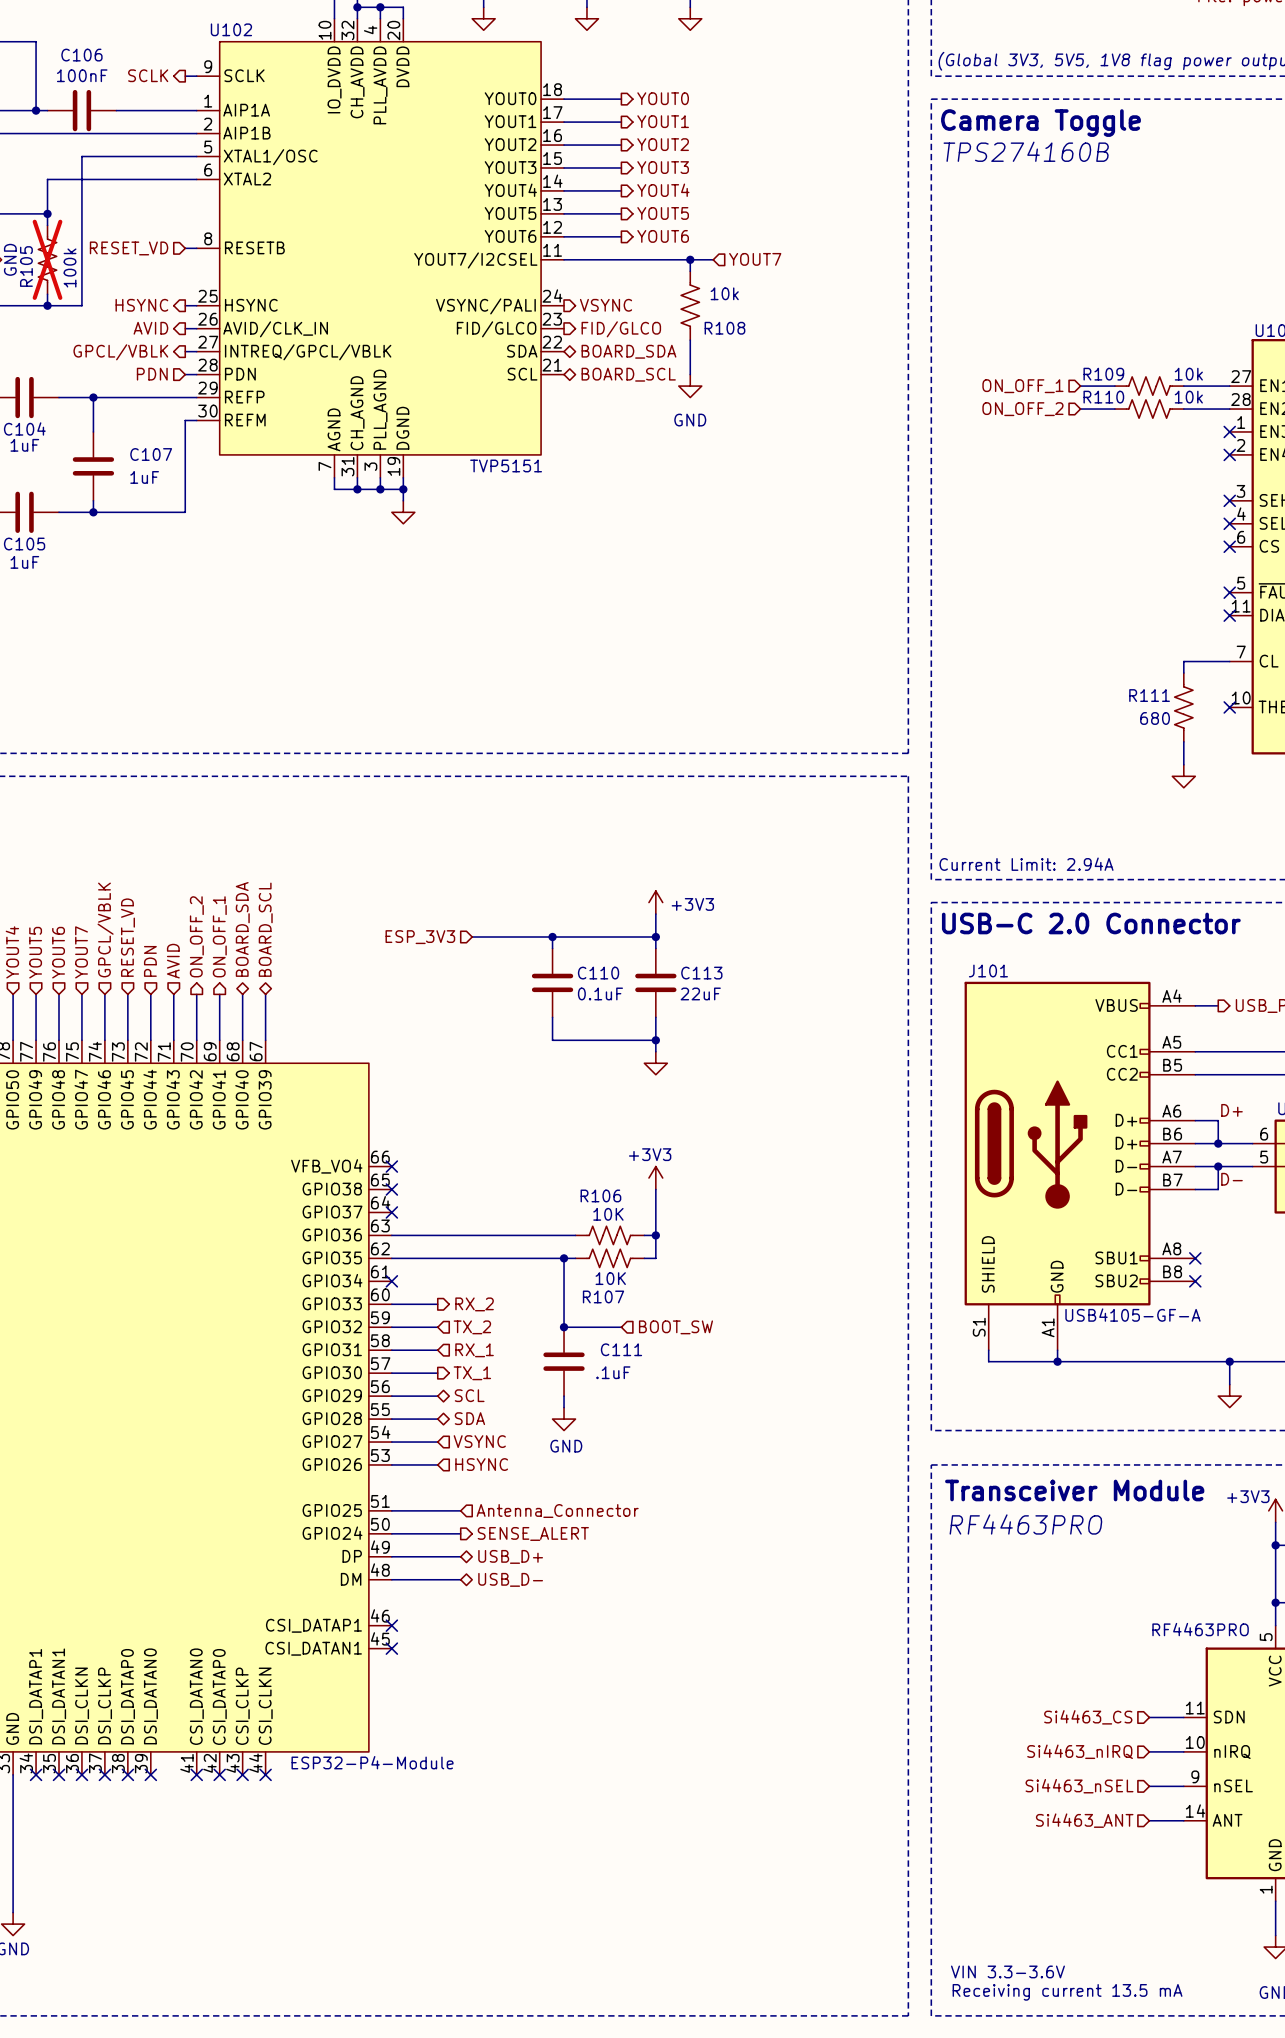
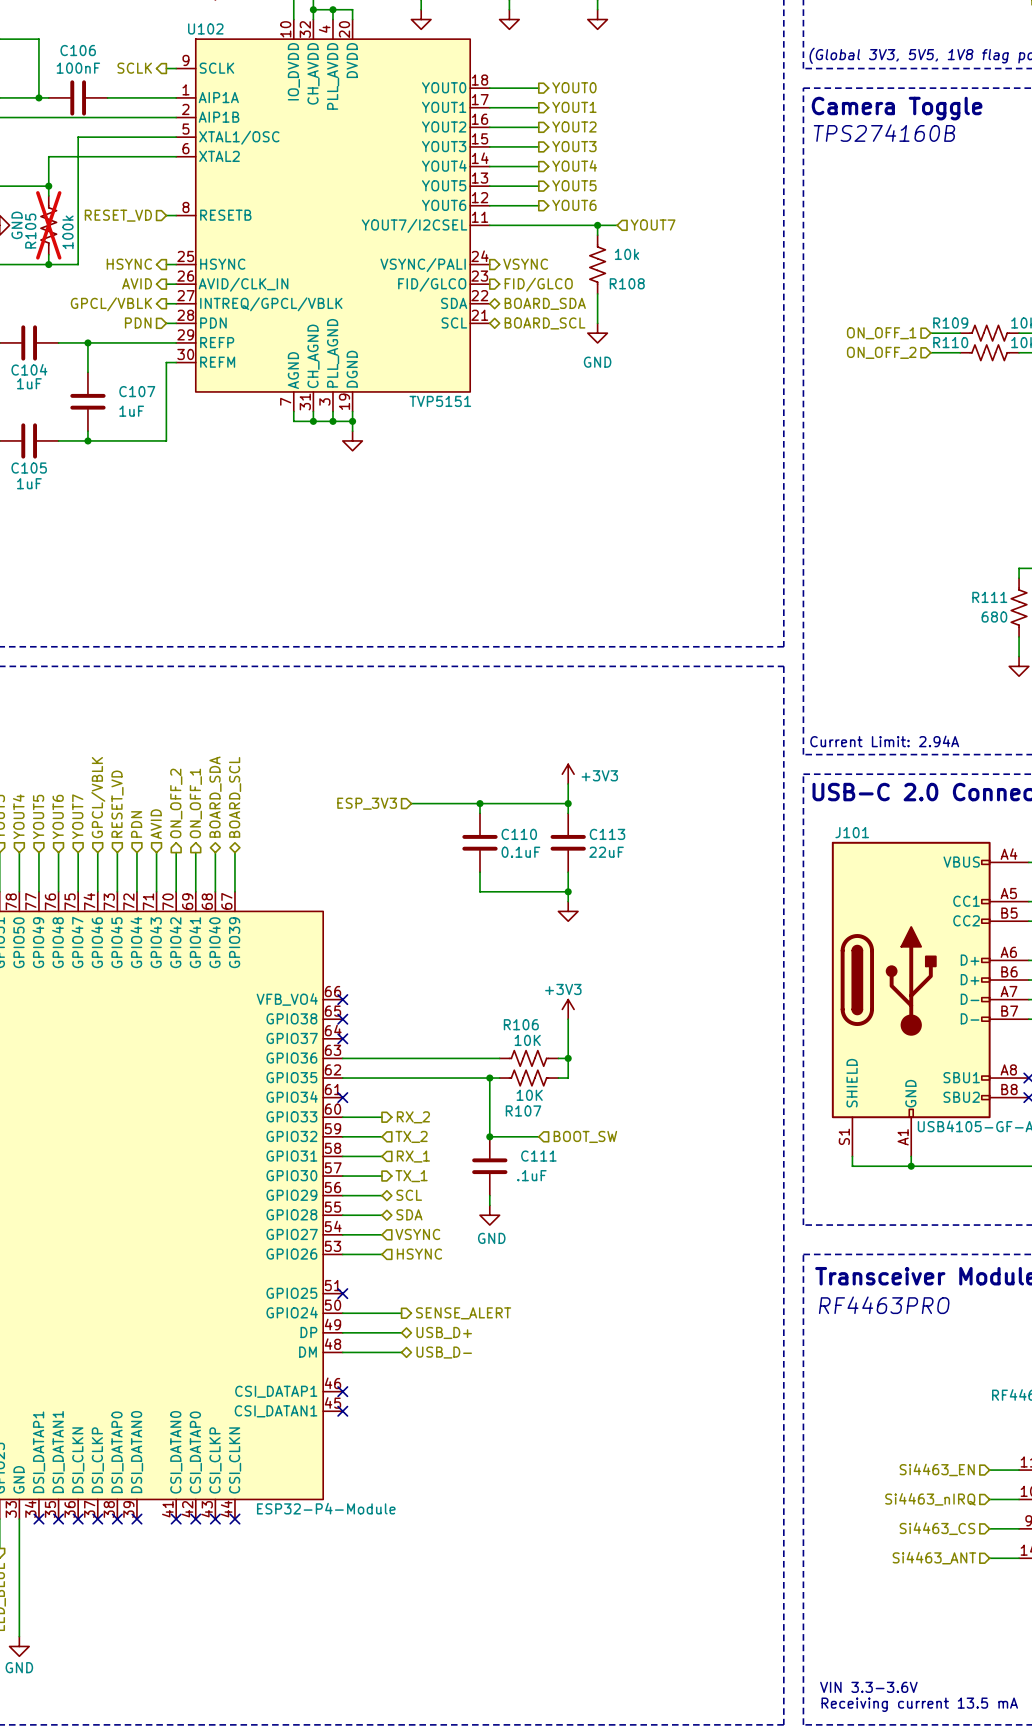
wire: (391, 1510) (460, 1510) -> none
no-connect mark: none -> (342, 1293)
hierarchical label: Antenna_Connector (557, 1511) -> none
hierarchical label: Si4463_CS (1088, 1717) -> Si4463_EN (937, 1469)
hierarchical label: Si4463_nSEL (1079, 1786) -> Si4463_CS (937, 1528)

